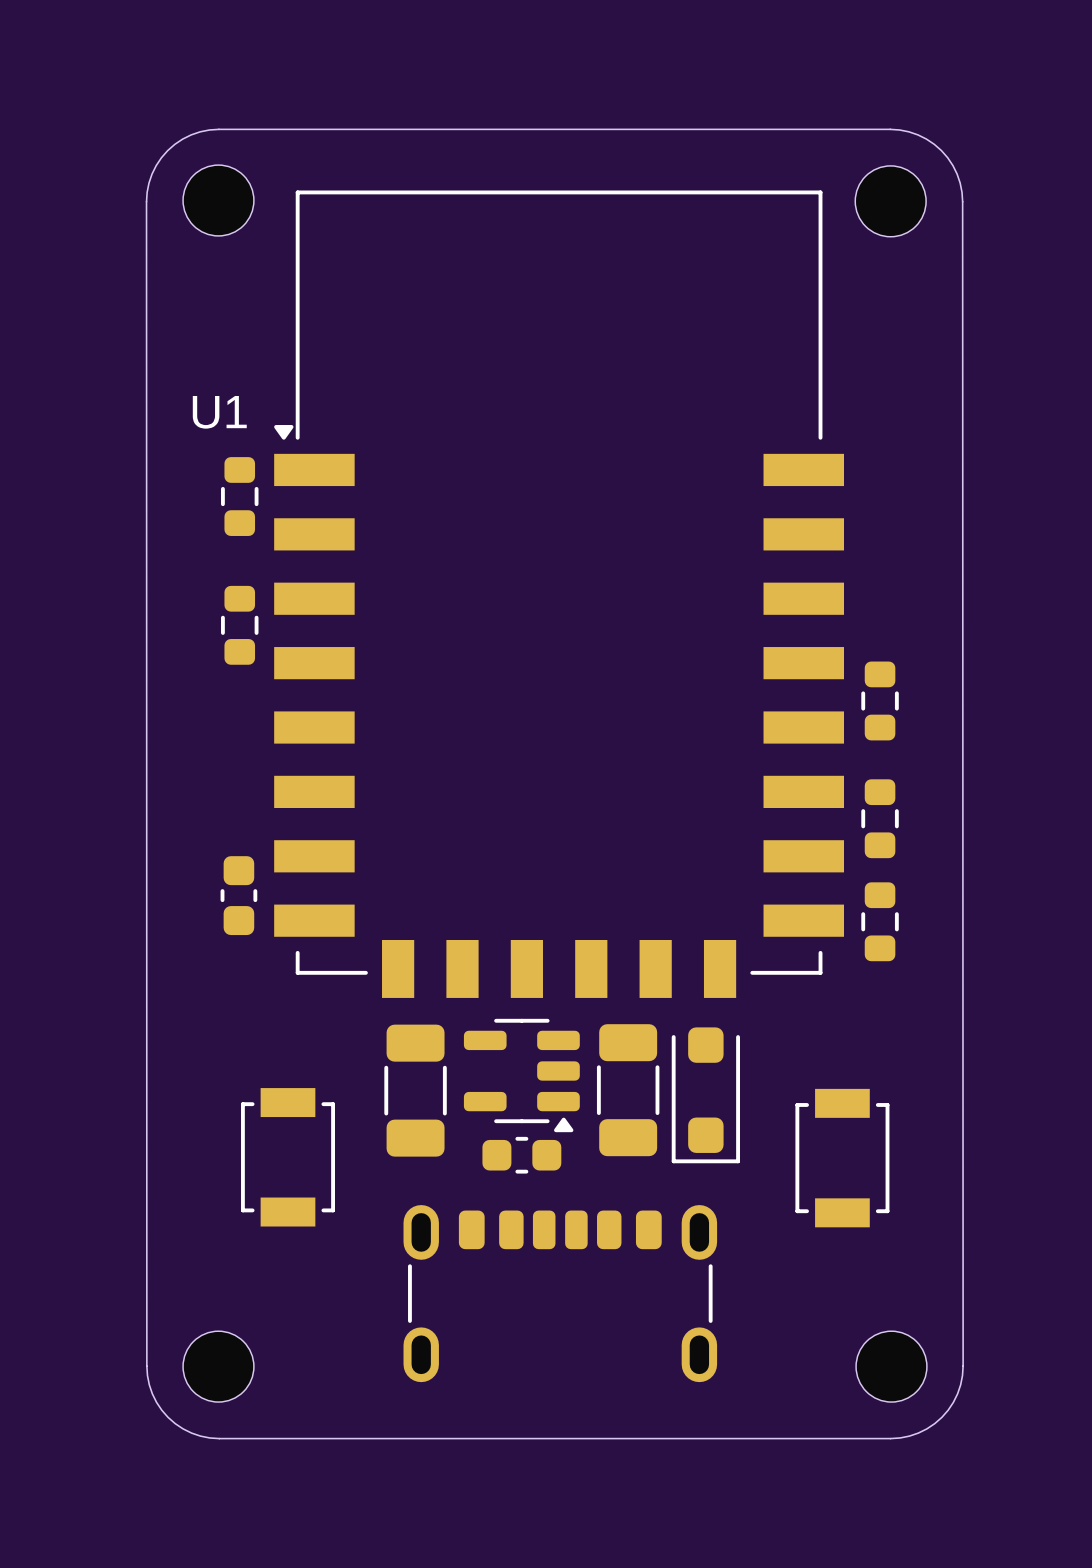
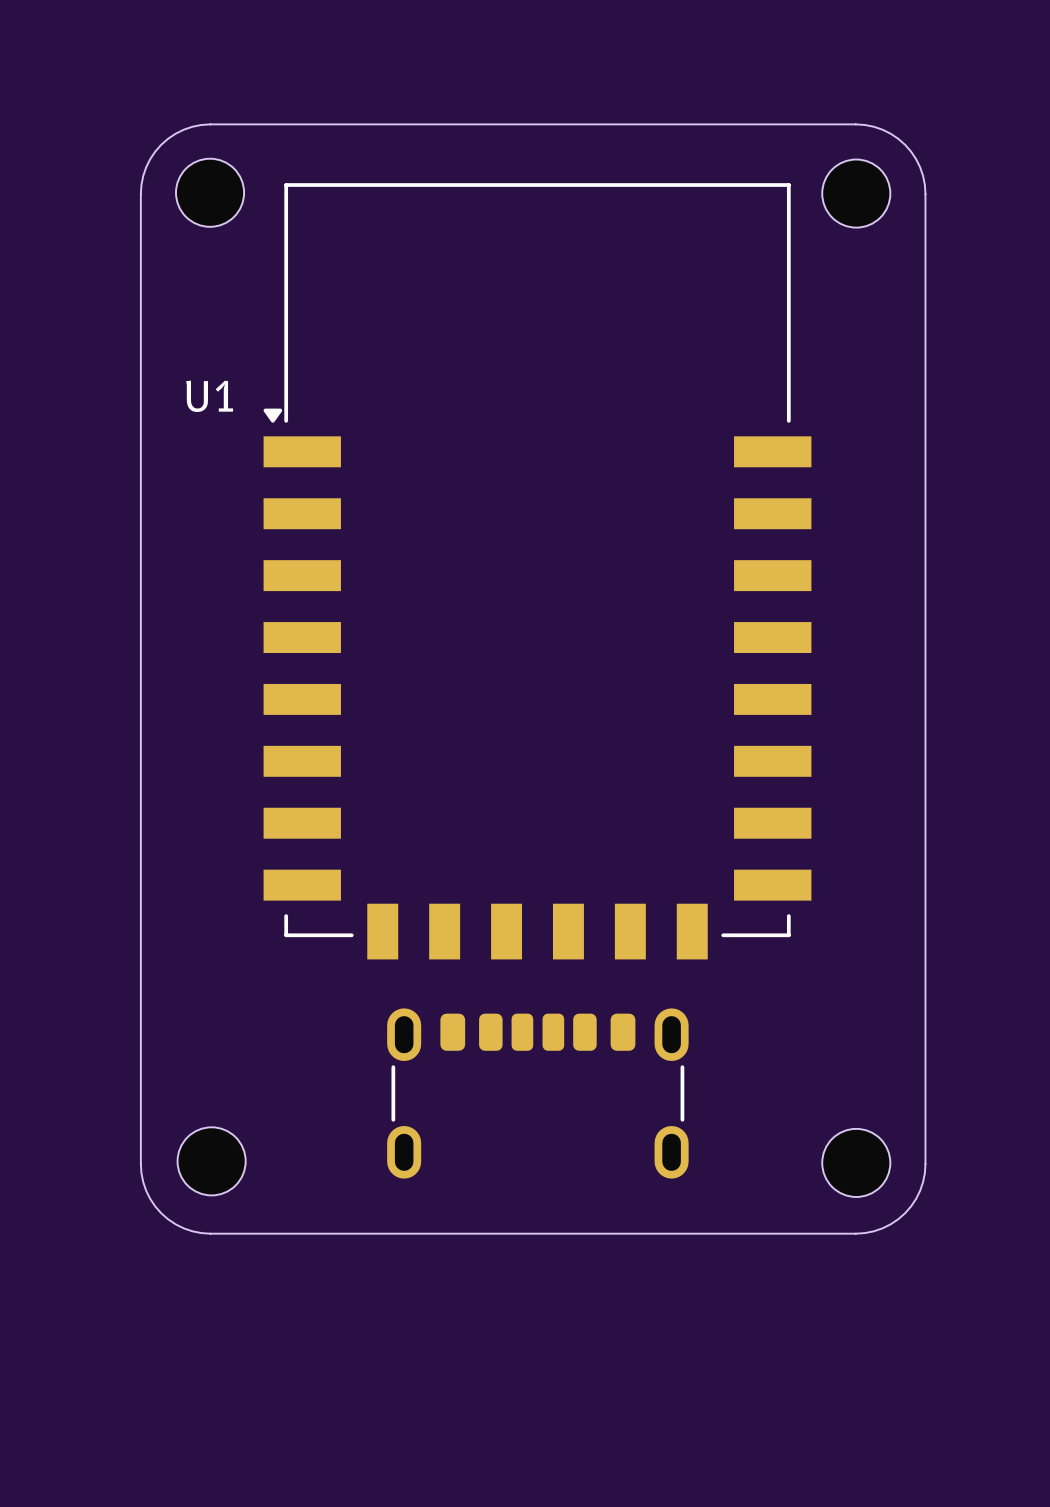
board edge: (146, 201) (146, 1366) (152, 1393) (168, 1417) (191, 1433) (219, 1438) (890, 1438) (909, 1436) (926, 1428) (941, 1417) (953, 1402) (960, 1384) (963, 1366) (962, 201) -> (140, 194) (141, 1173) (146, 1190) (161, 1213) (183, 1228) (210, 1233) (855, 1233) (873, 1231) (890, 1224) (911, 1206) (920, 1190) (925, 1164) (925, 194)
part: (239, 496) -> none
part: (239, 625) -> none
part: (880, 700) -> none
part: (880, 818) -> none
part: (238, 895) -> none
part: (880, 921) -> none
part: (521, 1075) -> none
part: (415, 1090) -> none
part: (628, 1090) -> none
part: (705, 1095) -> none
part: (521, 1155) -> none
part: (287, 1157) -> none
part: (842, 1158) -> none
part position: (560, 1293) -> (537, 1093)
part position: (218, 1366) -> (211, 1161)
part position: (891, 1366) -> (856, 1162)

